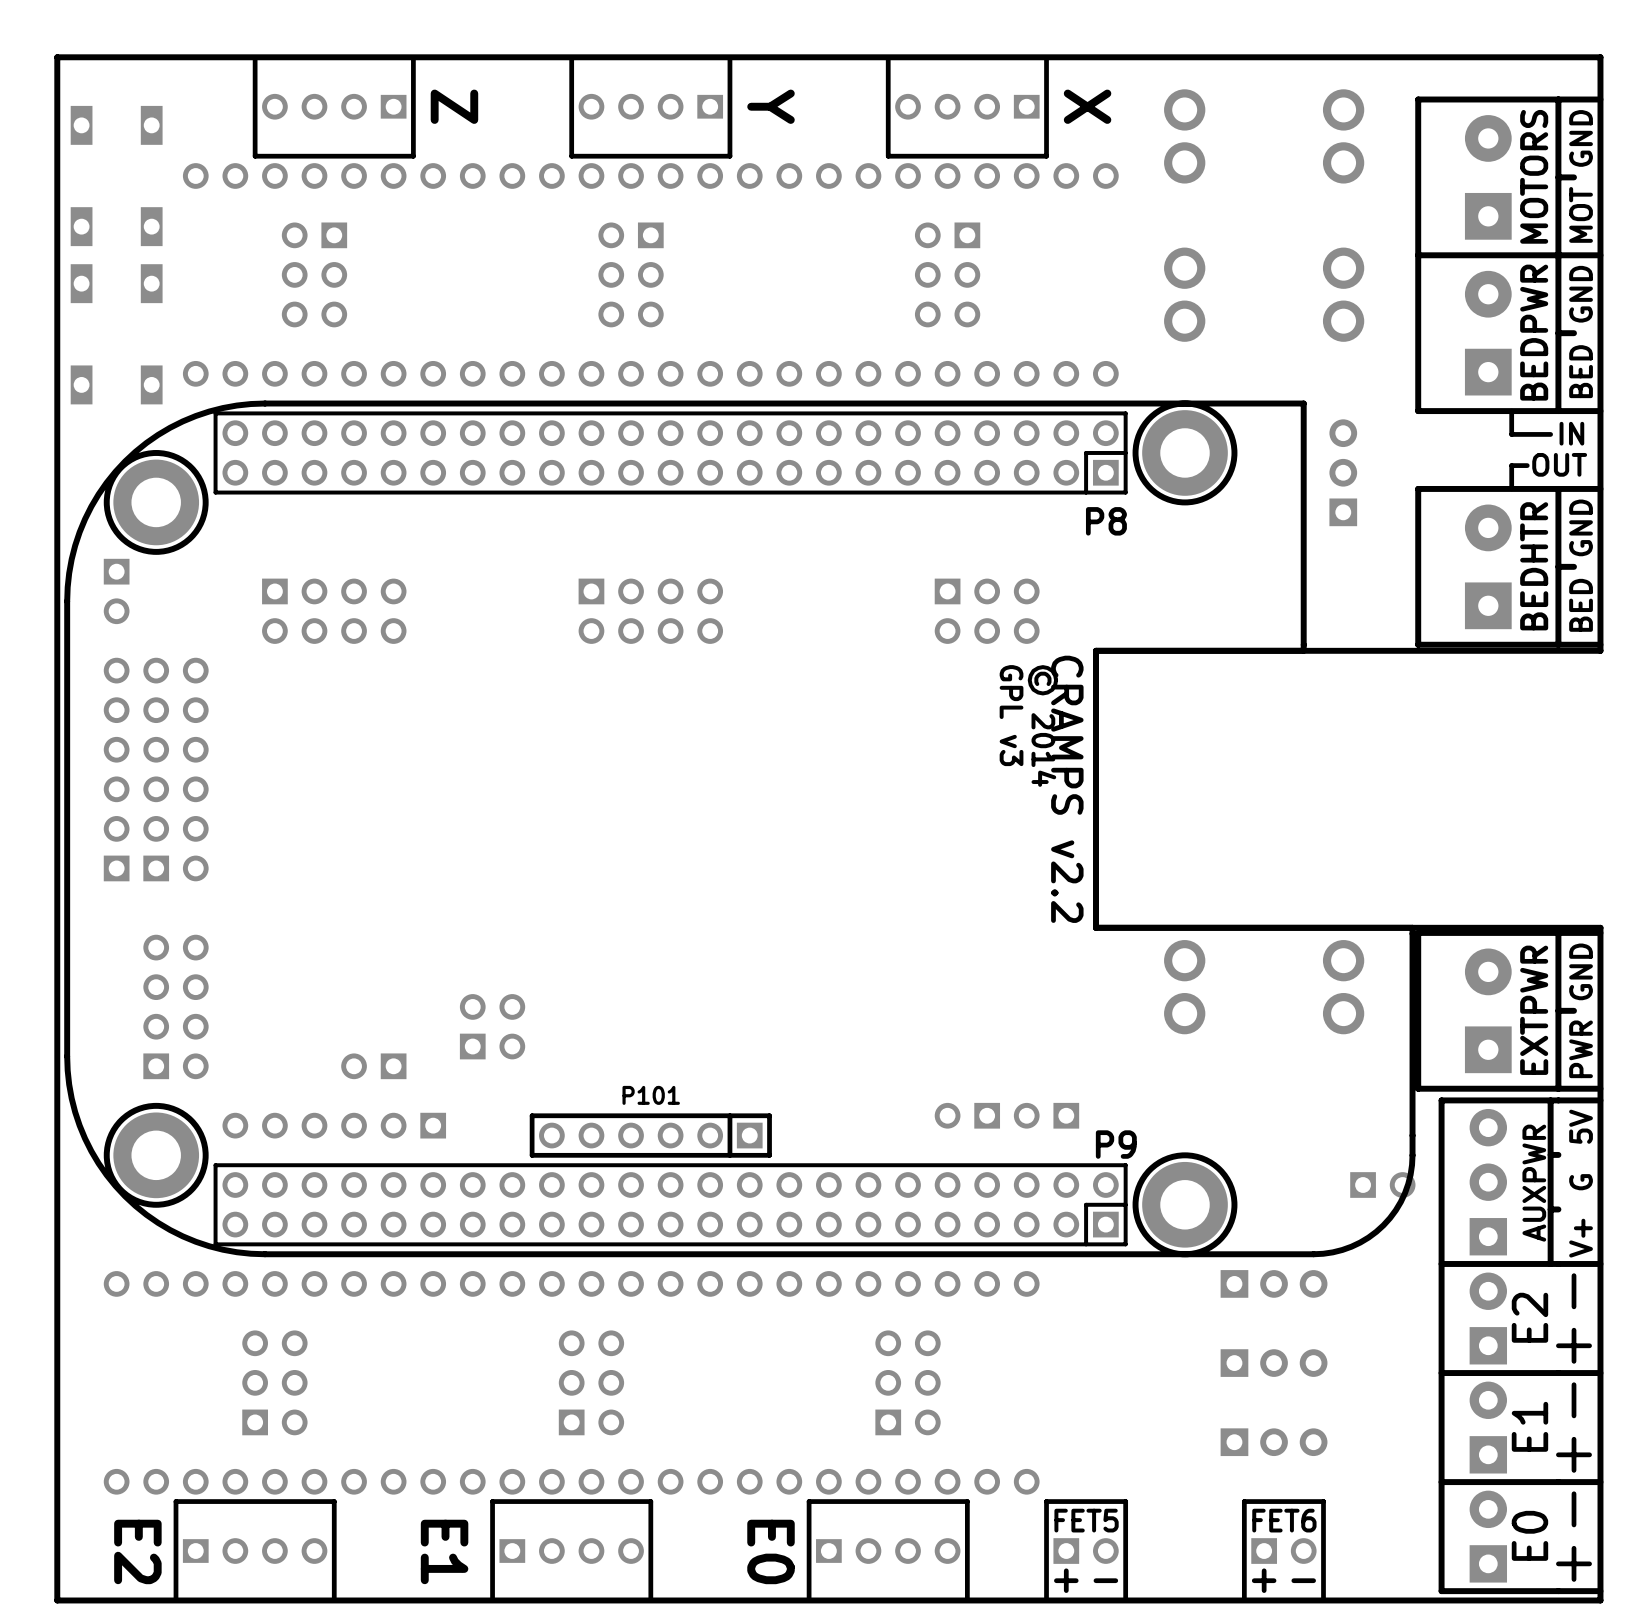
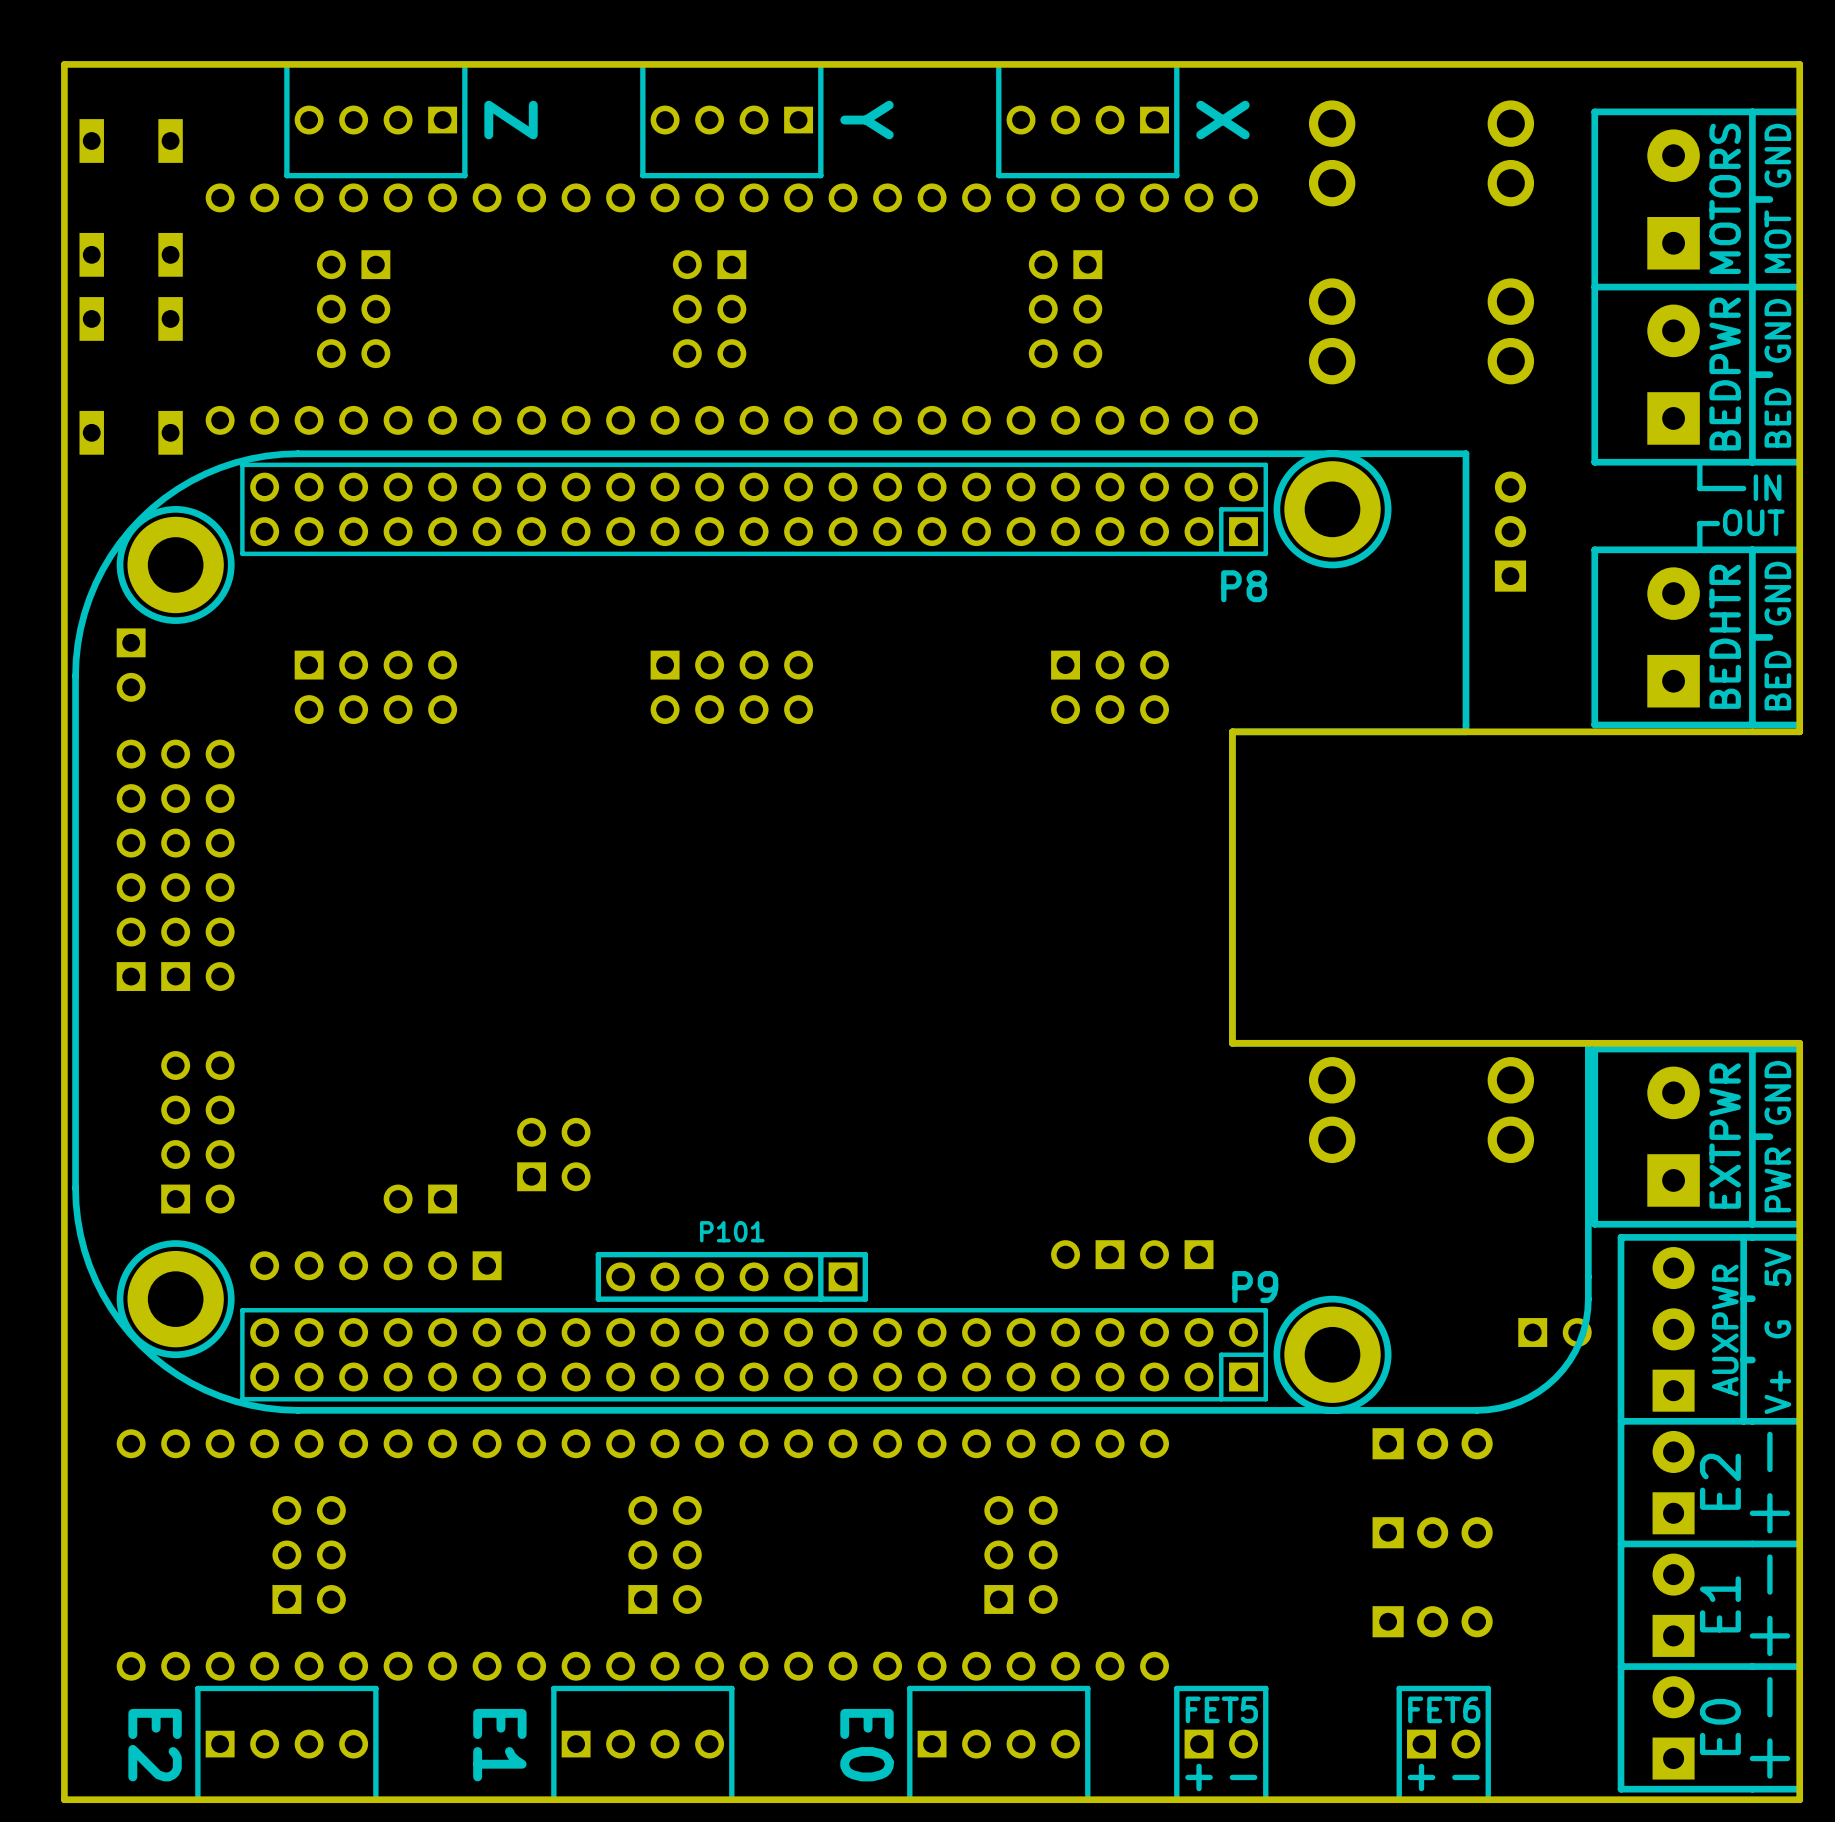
text: GPL v3 (1011, 715) -> none
text: © 2014 (1042, 725) -> none
text: CRAMPS v2.2 (1067, 789) -> none

